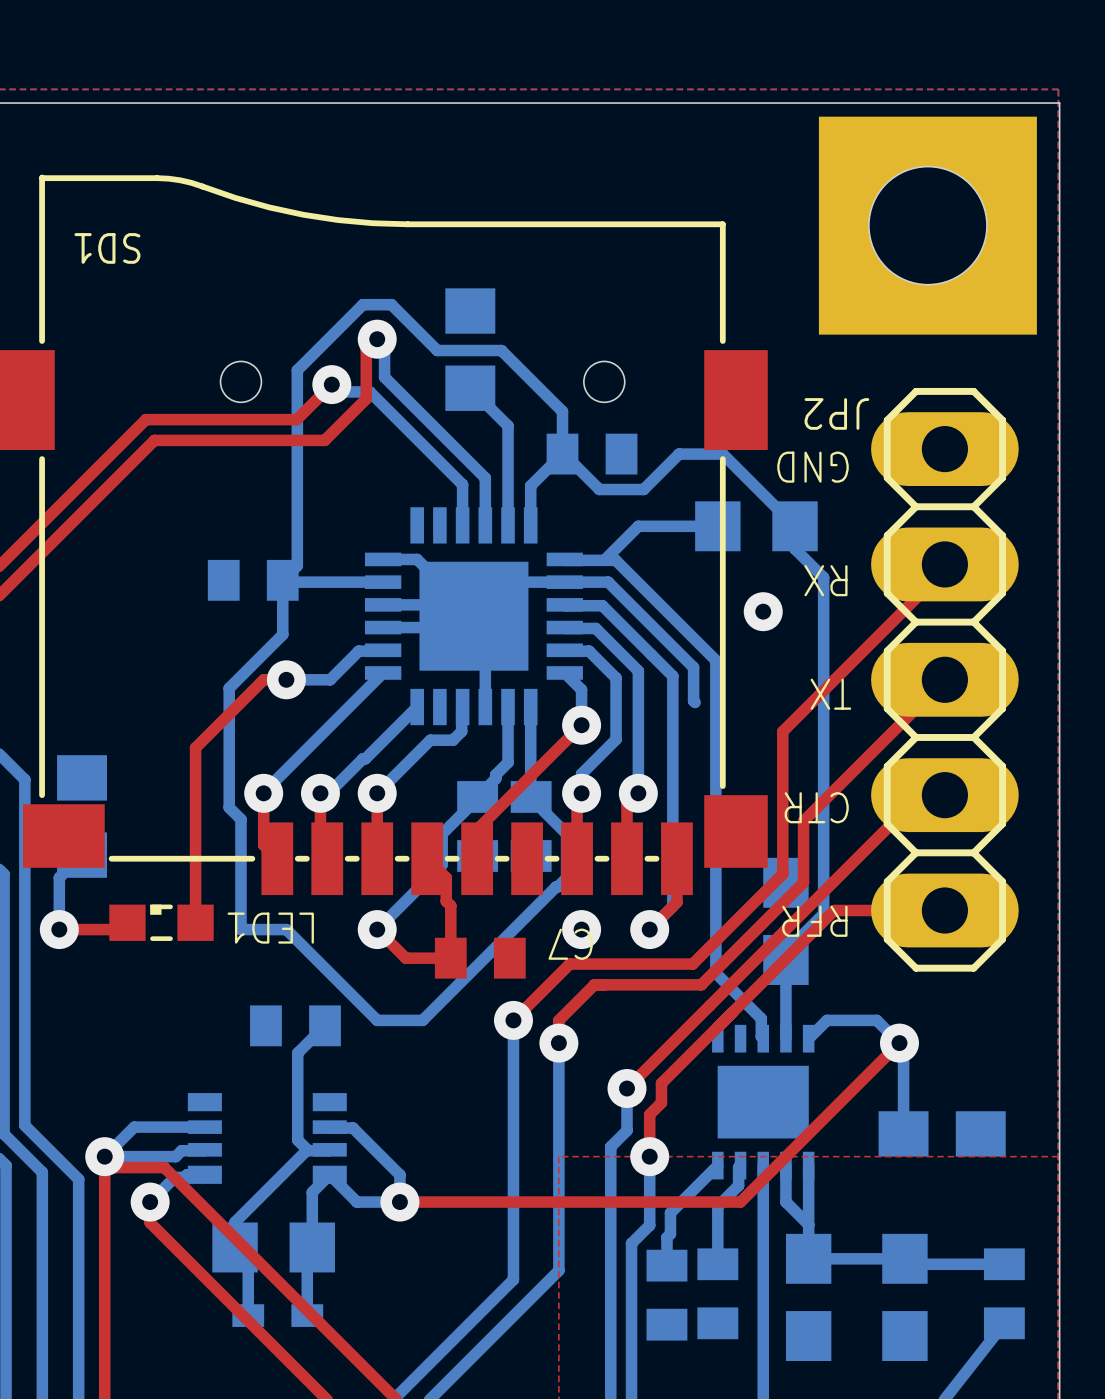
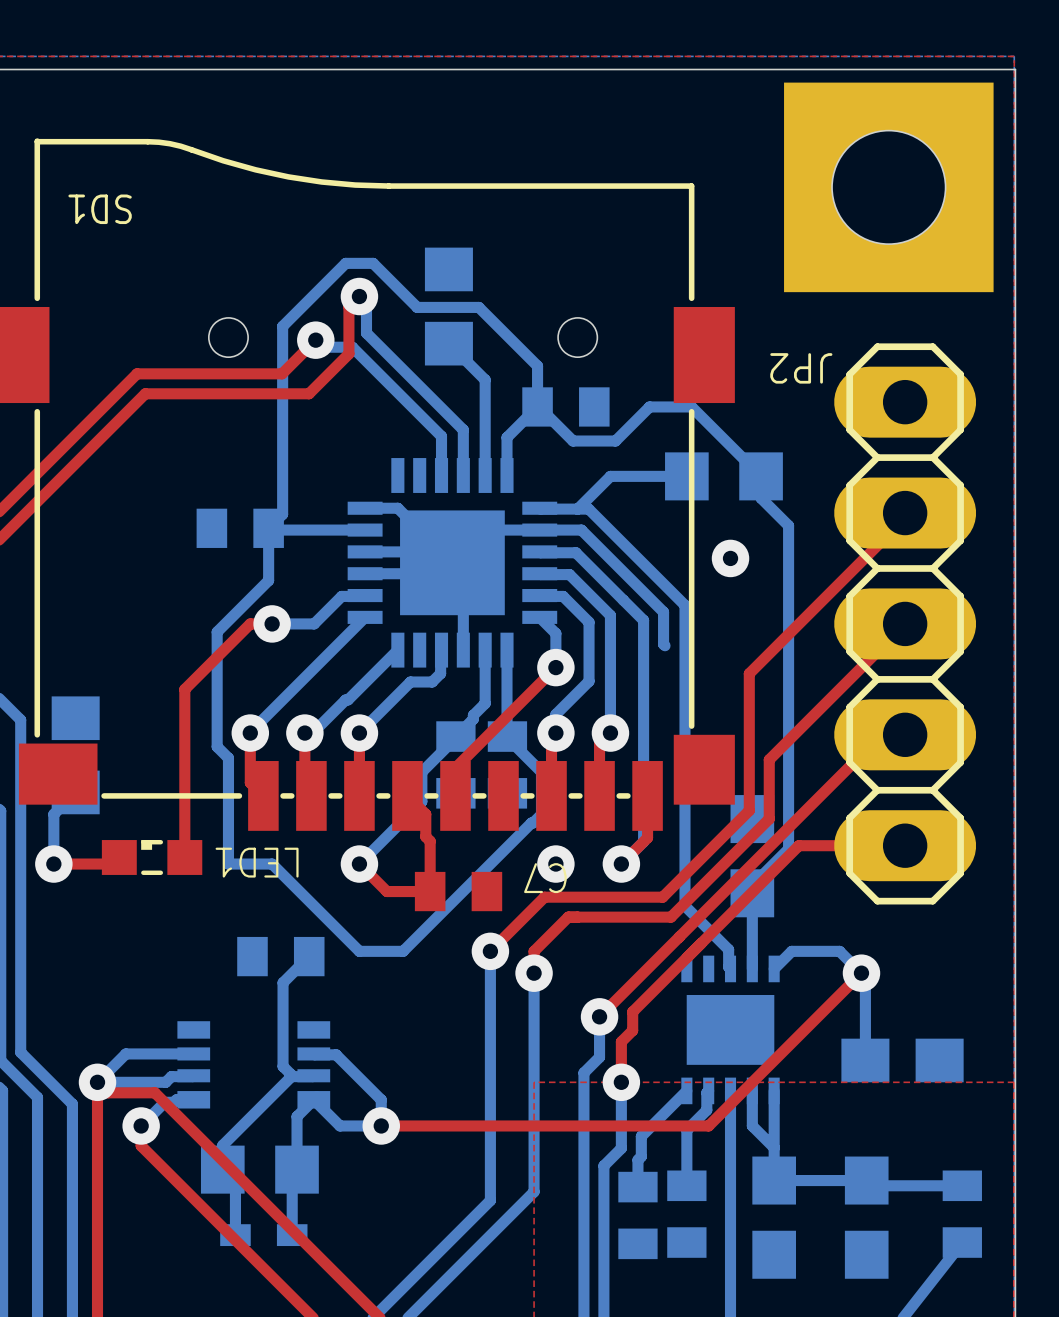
text: GND (813, 467) -> none
text: RX (825, 580) -> none
text: TX (830, 694) -> none
text: CTR (816, 807) -> none
text: RFR (814, 921) -> none

